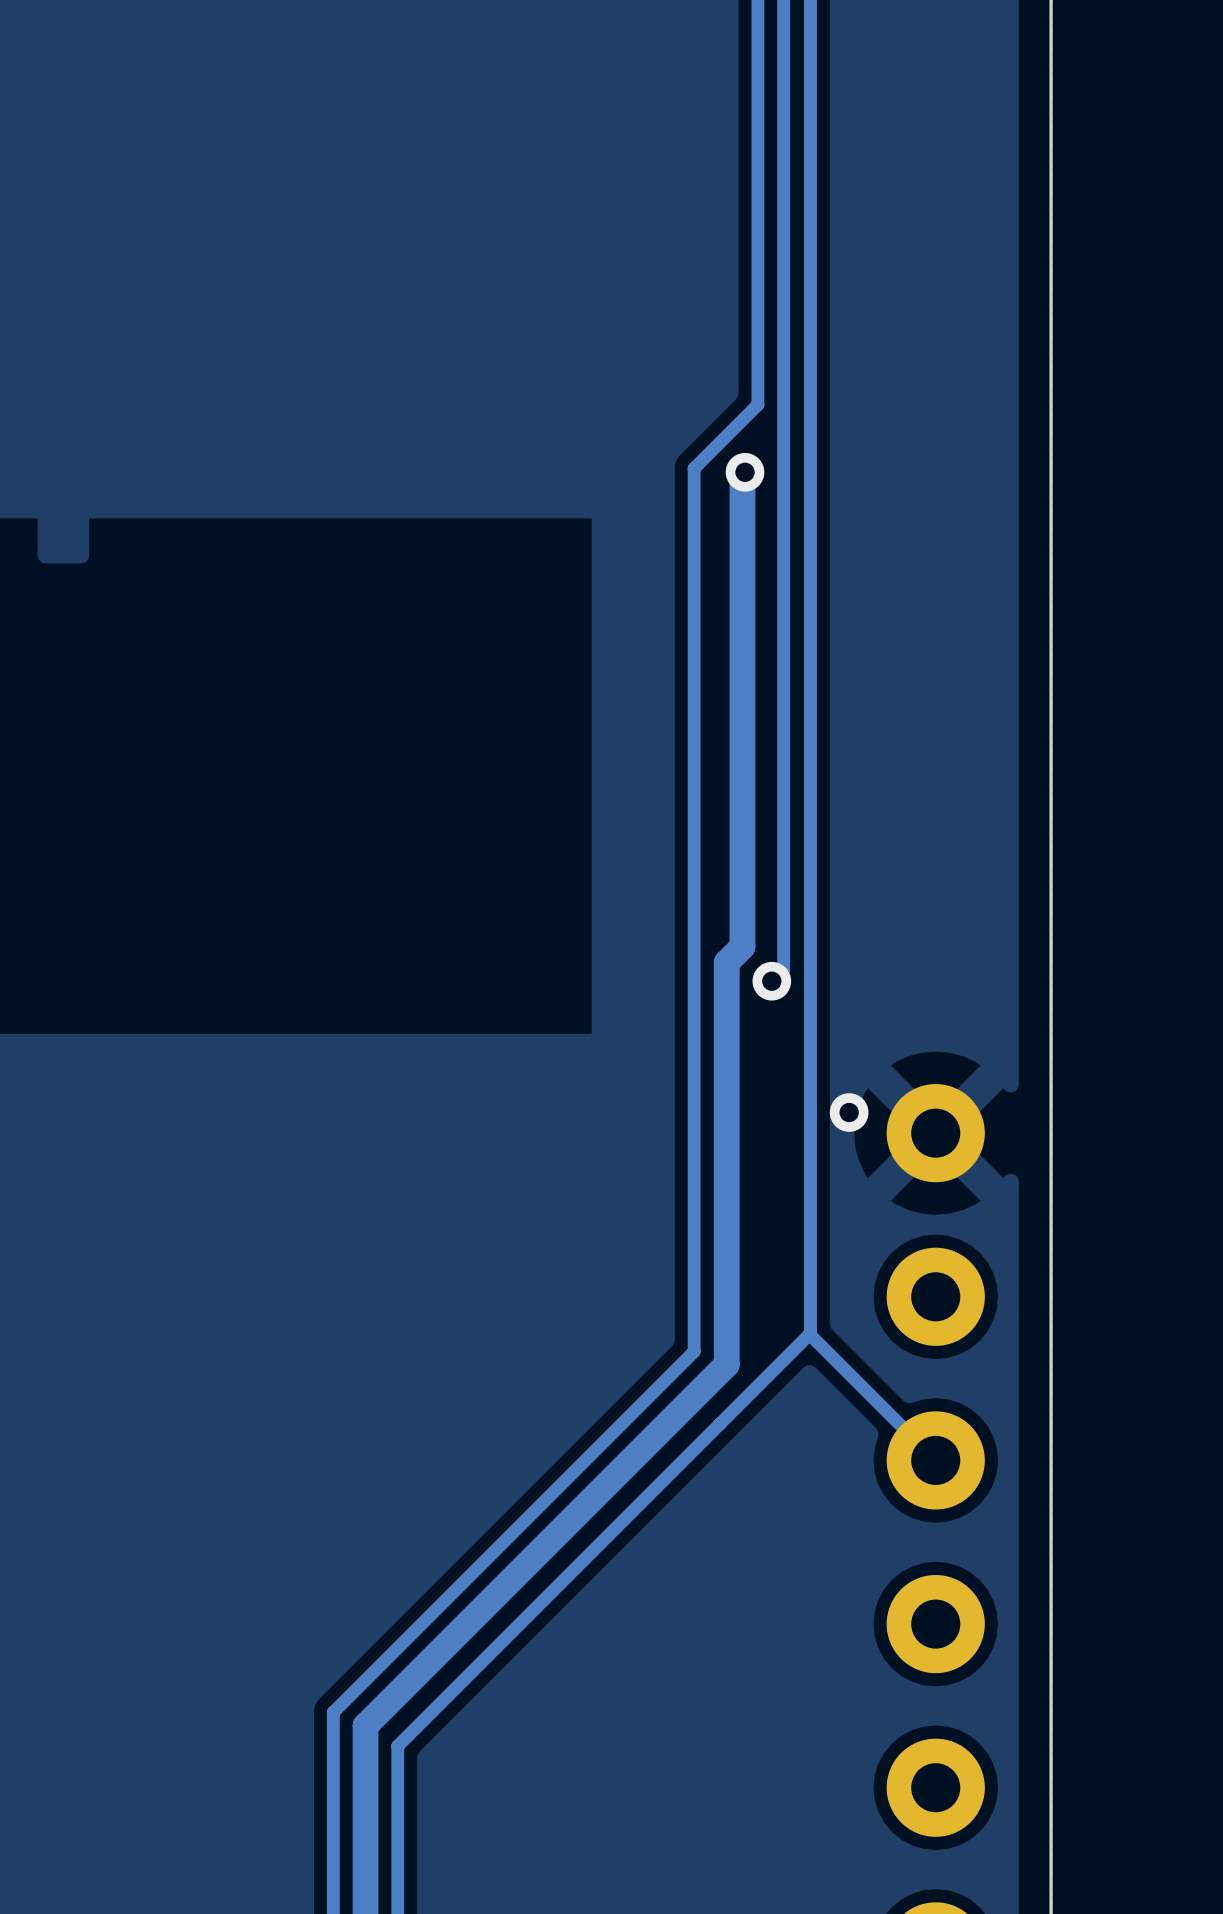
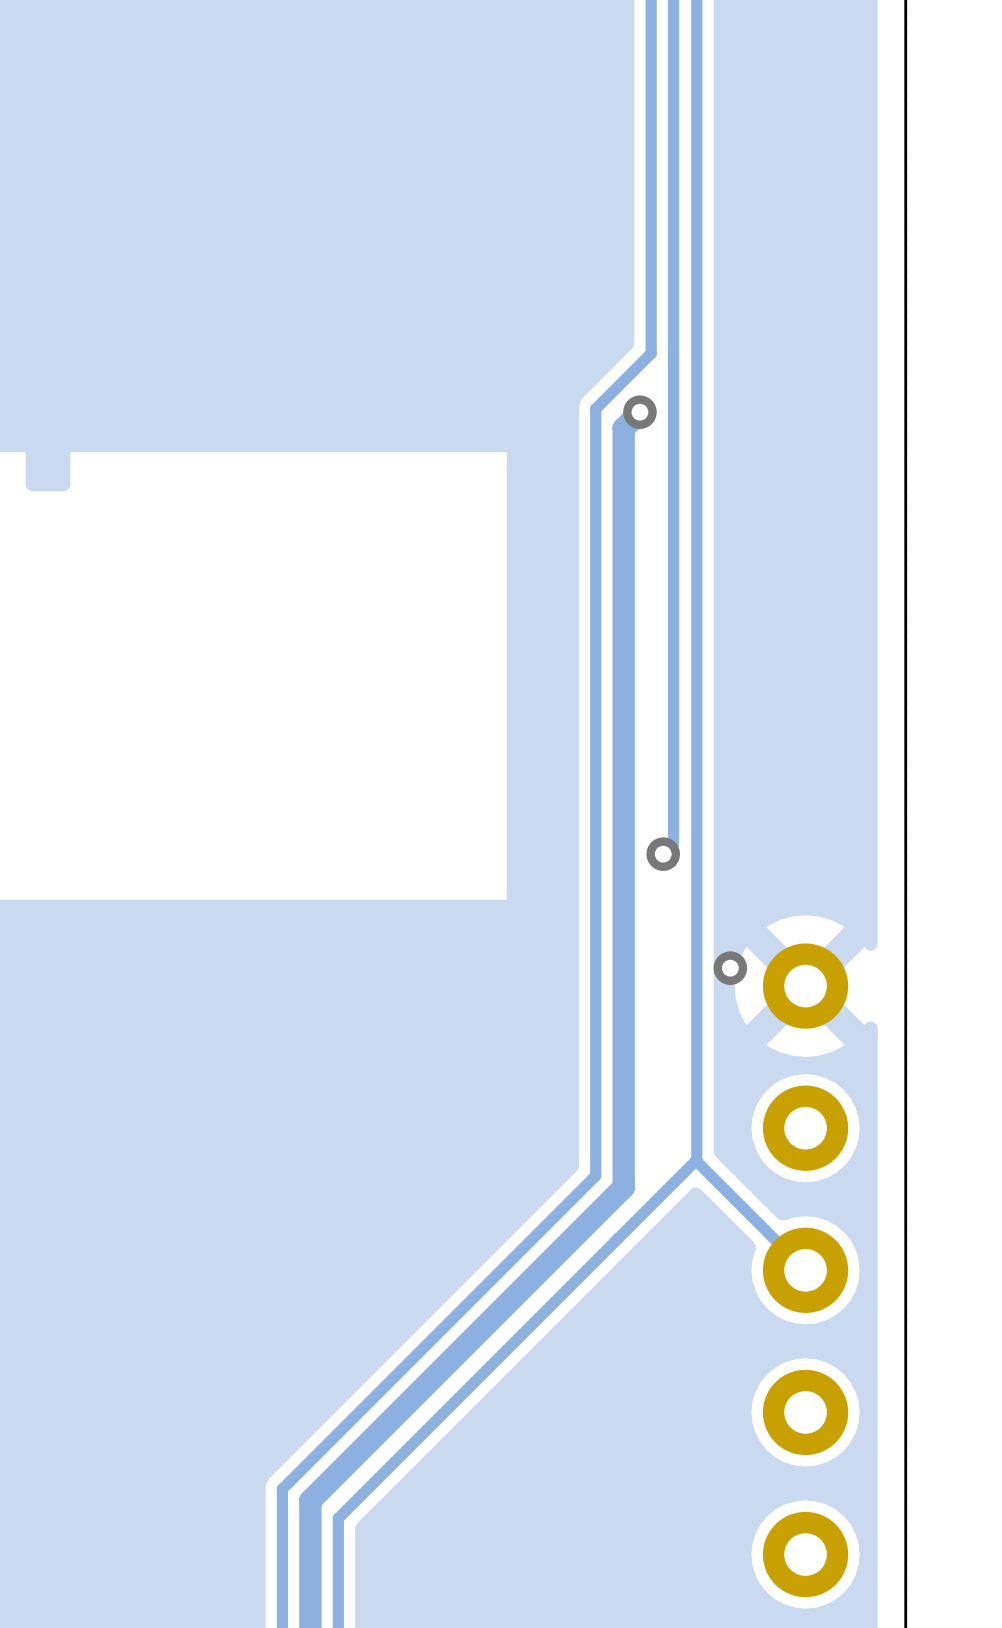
track: (742, 474) (742, 946) (726, 962) (726, 1364) -> (637, 414) (623, 428) (623, 1187)

